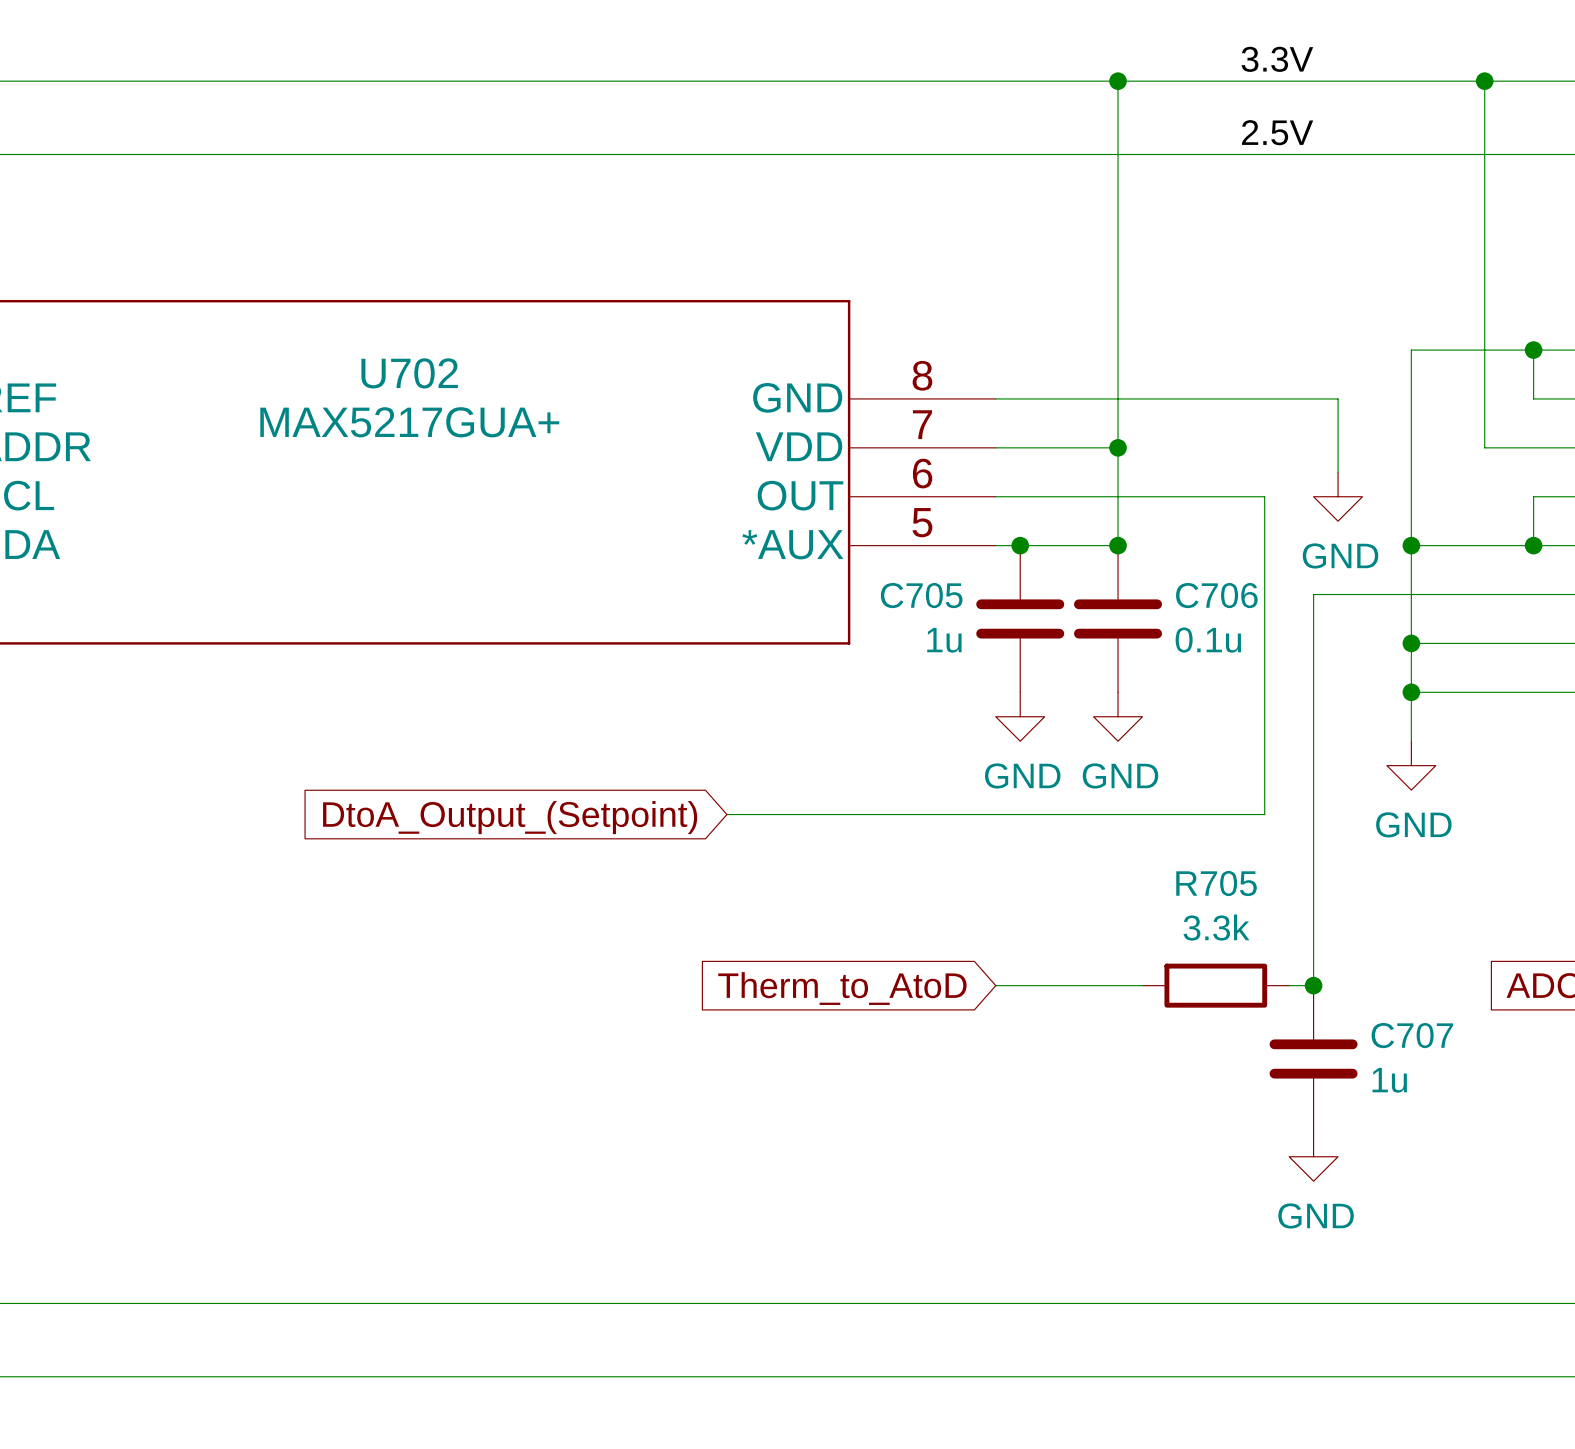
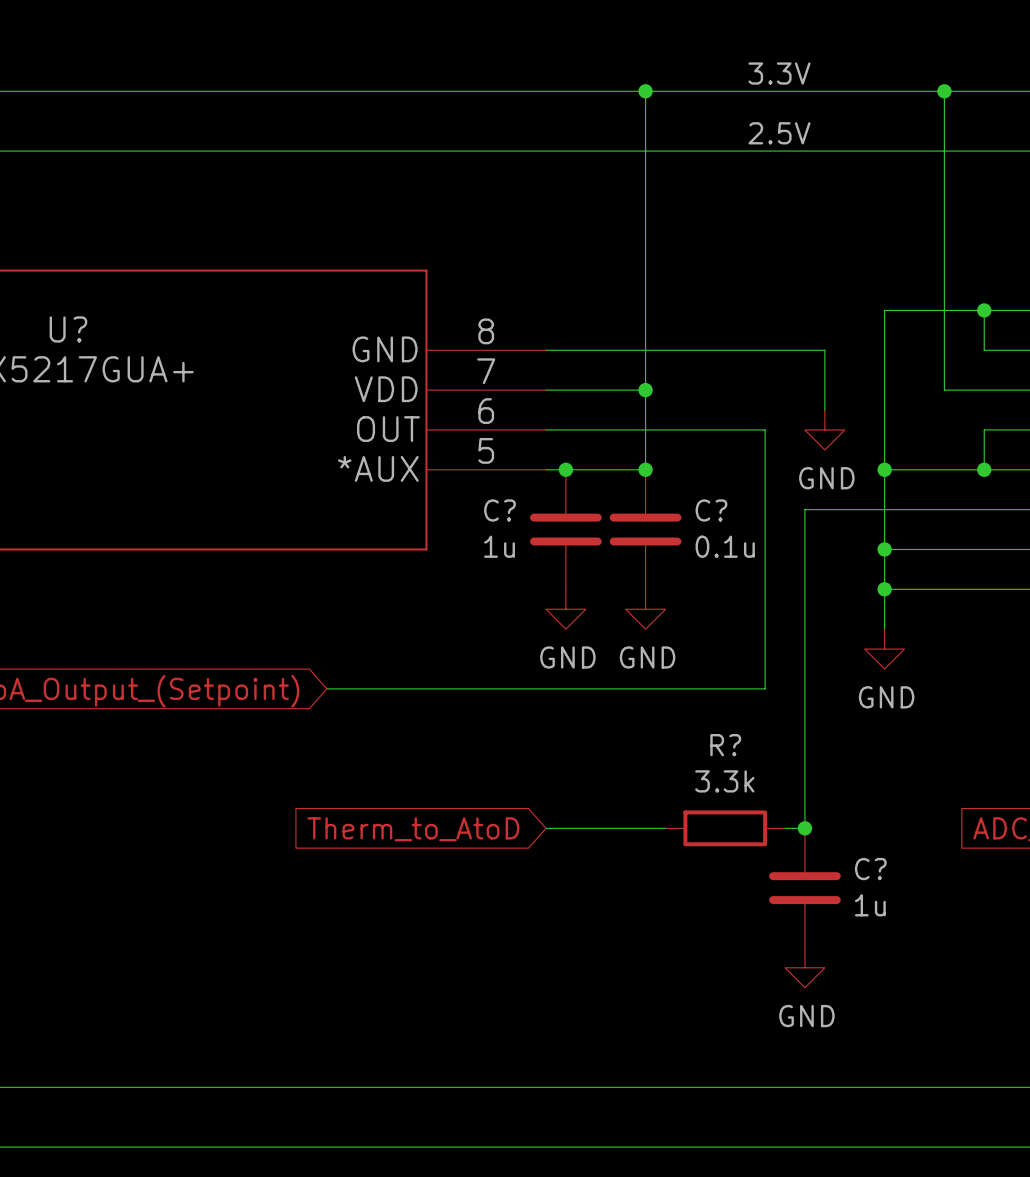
U702 name: U702 (409, 373) -> U? (68, 329)
C705 name: C705 (921, 595) -> C? (500, 510)
C706 name: C706 (1216, 595) -> C? (711, 510)
R705 name: R705 (1216, 883) -> R? (725, 745)
C707 name: C707 (1412, 1035) -> C? (870, 869)

